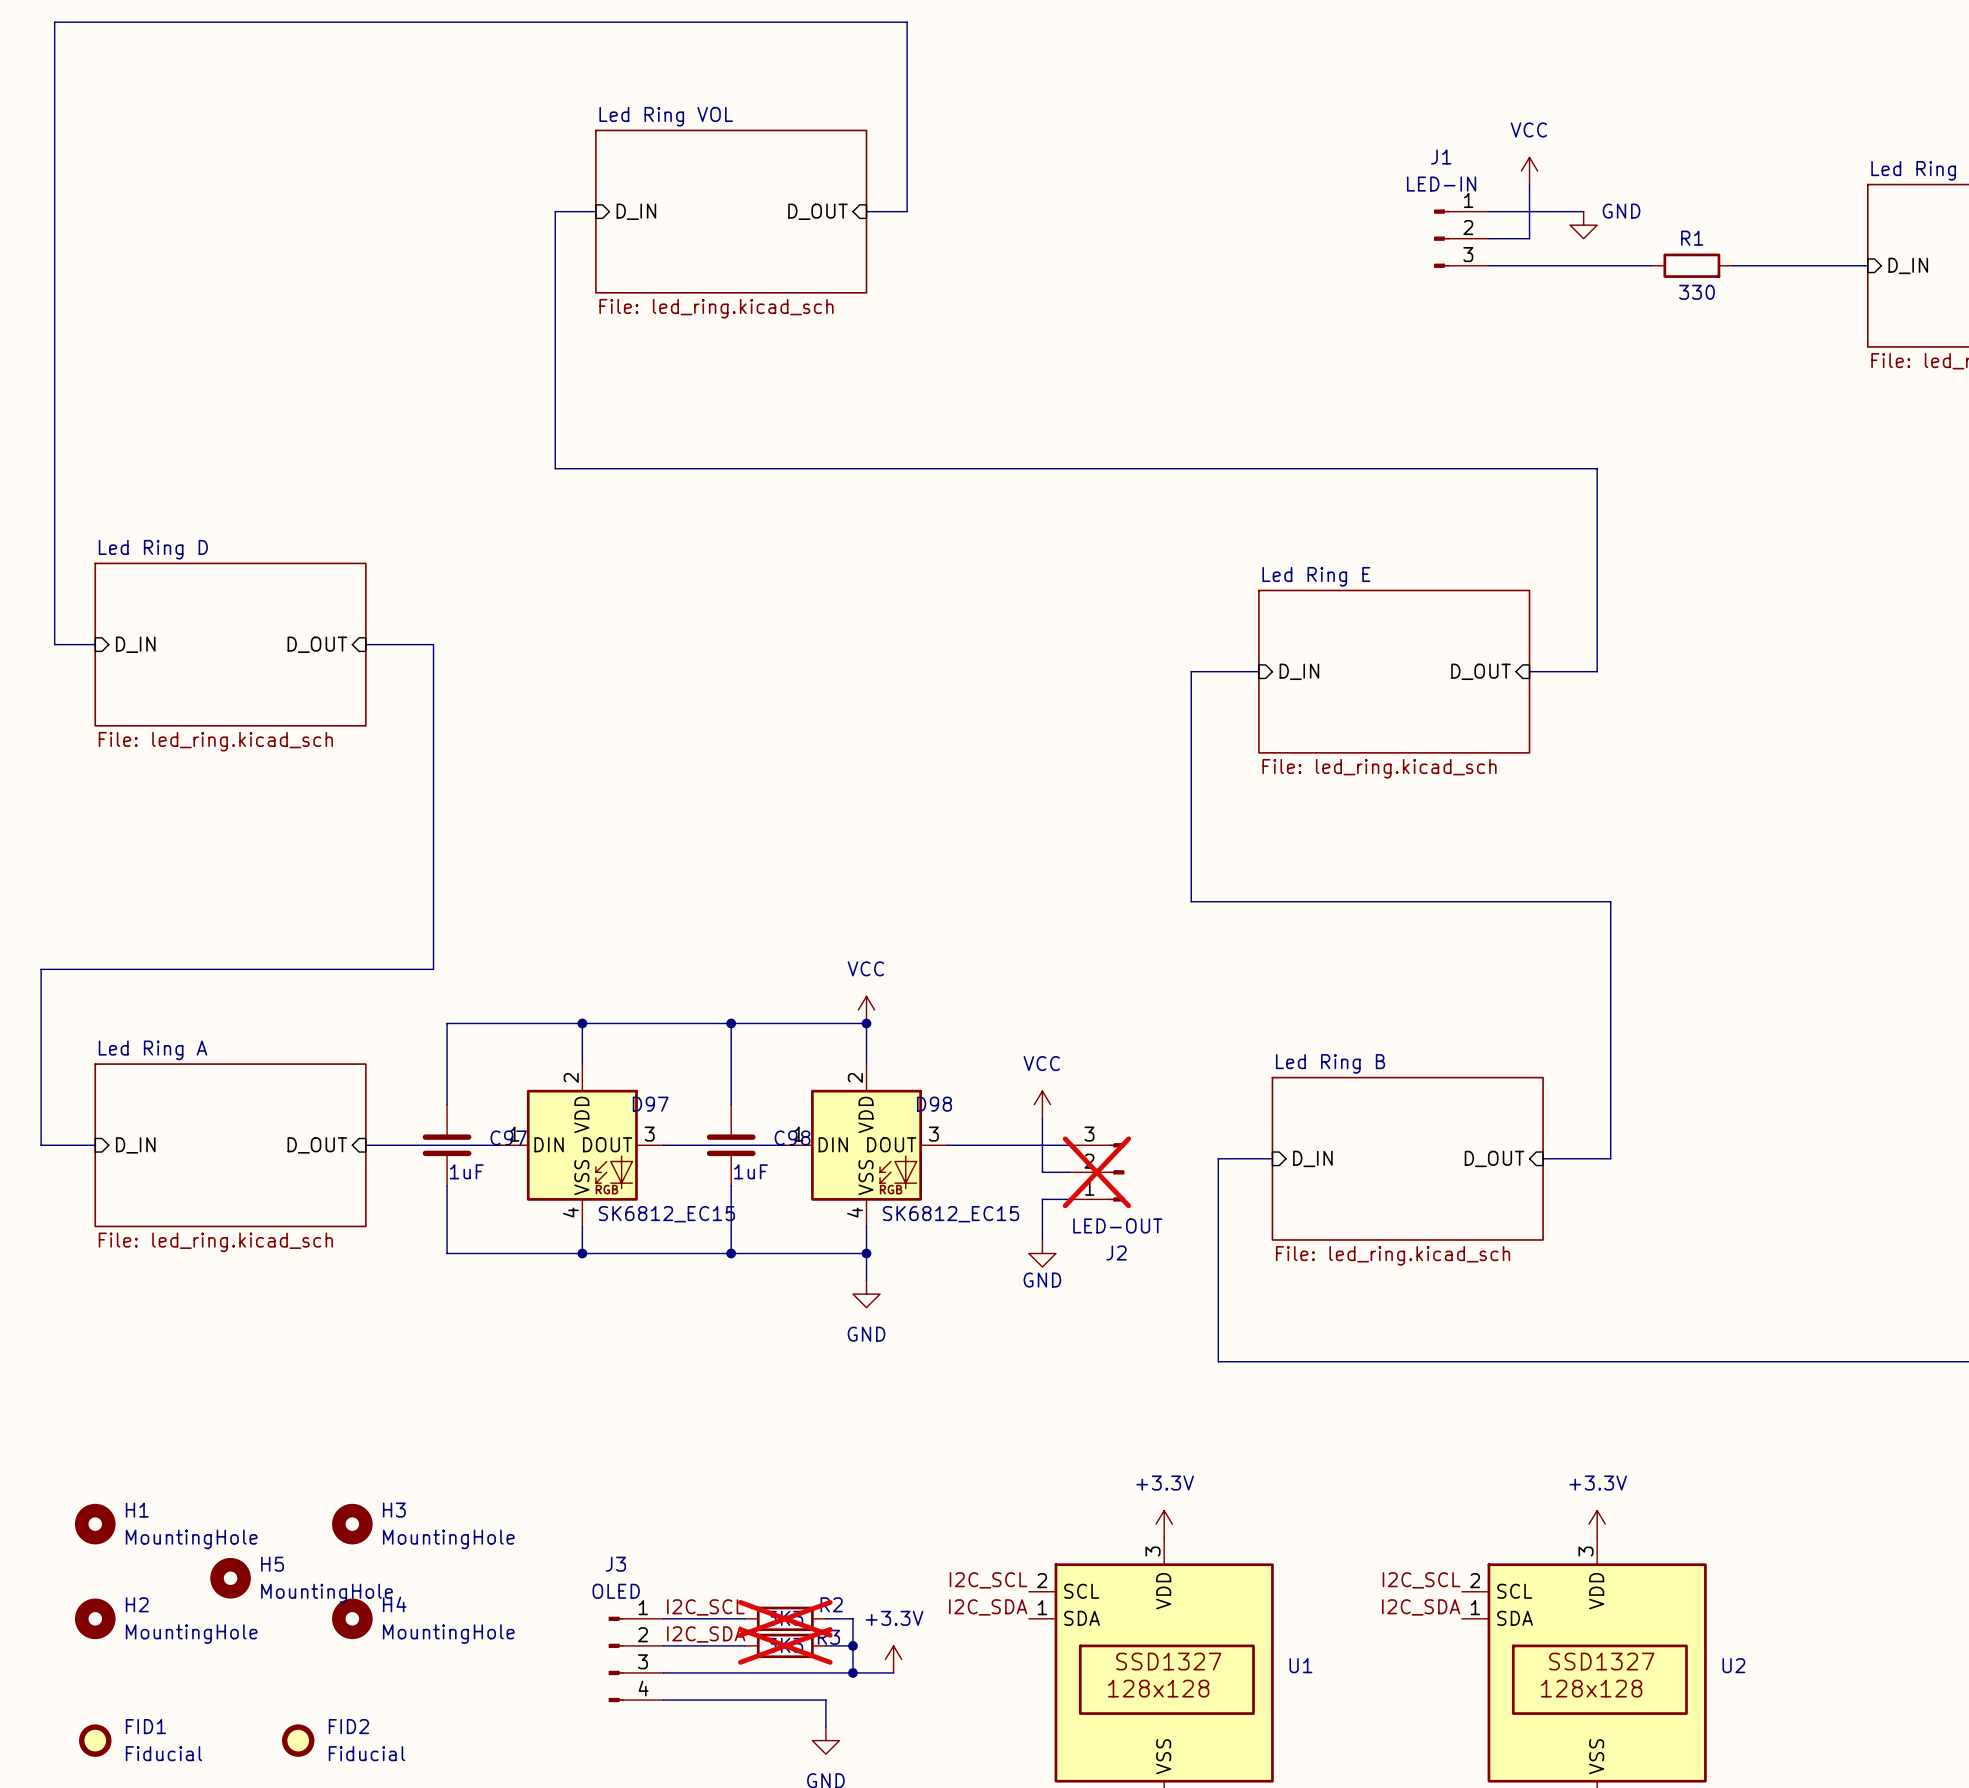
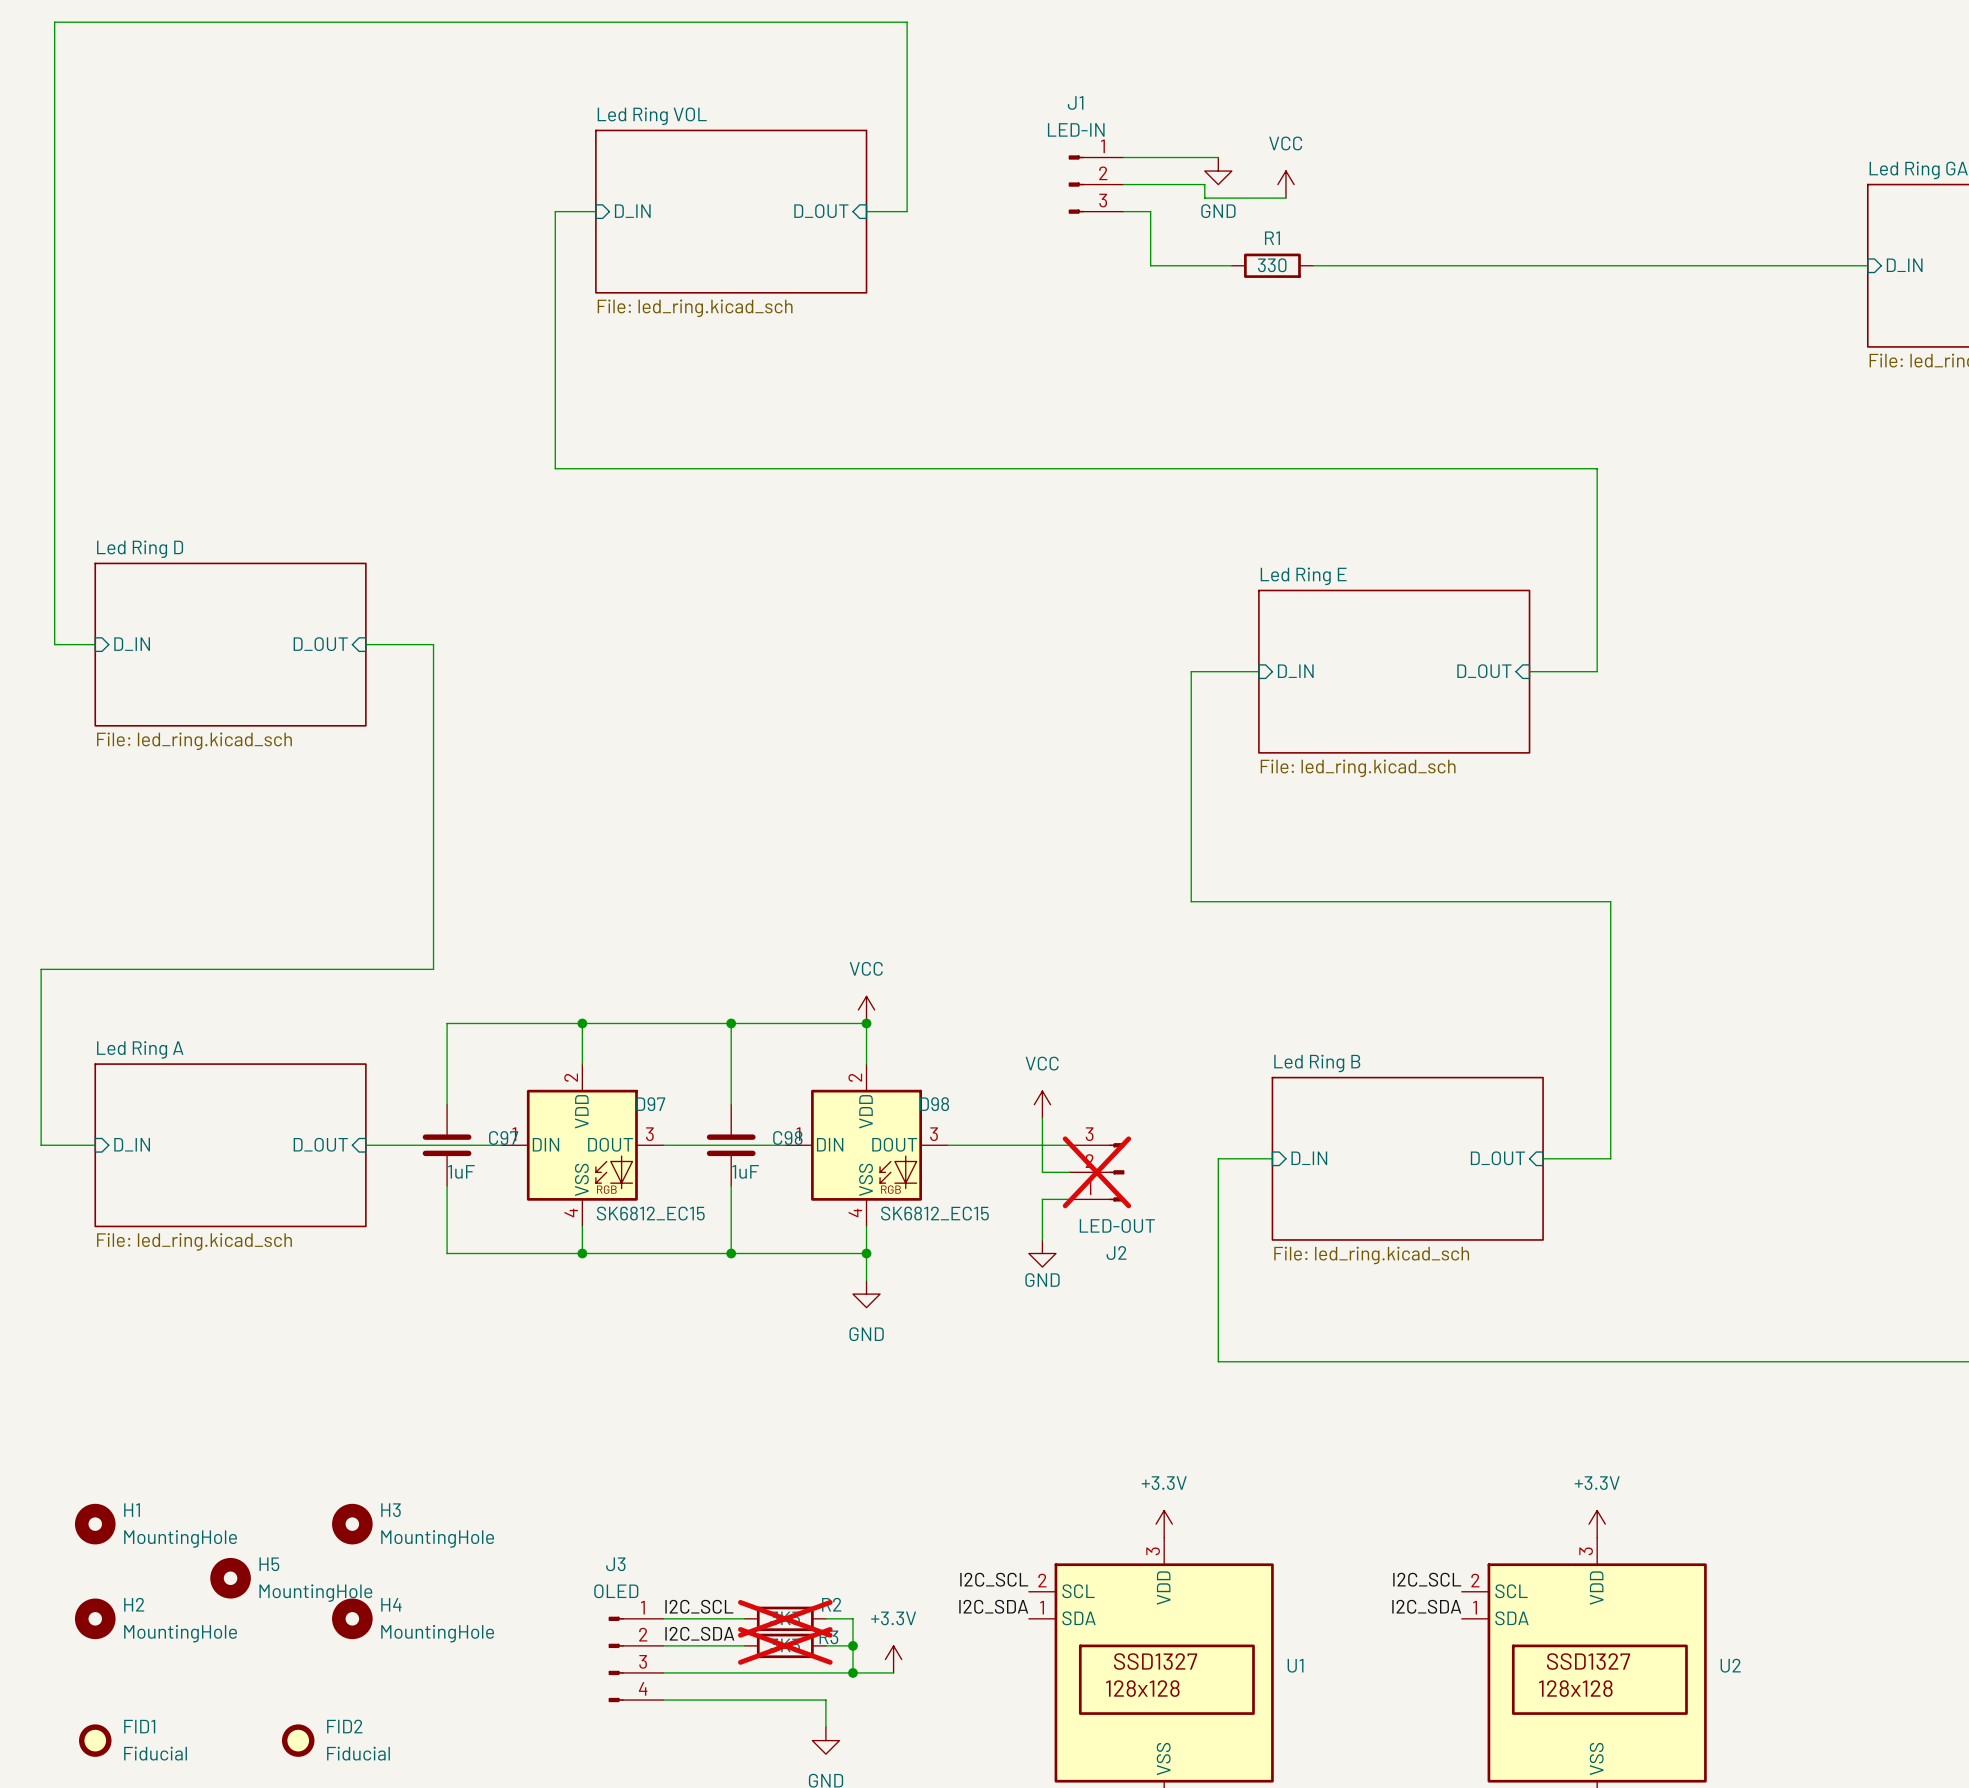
wire: none -> (1123, 157) (1218, 157)
power symbol: none -> GND (1218, 171)
power symbol position: VCC (1529, 171) -> VCC (1285, 184)
wire: none -> (1123, 184) (1204, 184) (1204, 198) (1285, 198)
wire: (1529, 184) (1529, 238) (1488, 238) -> none
wire: none -> (1123, 211) (1150, 211) (1150, 265) (1231, 265)
wire: (1488, 211) (1583, 211) -> none
power symbol: GND (1583, 225) -> none
J1 position: (1461, 238) -> (1096, 184)
wire: none -> (1313, 265) (1488, 265)
wire: none -> (1651, 265) (1732, 265)
R1 position: (1691, 265) -> (1272, 265)
R1 value position: 330 (1696, 292) -> 330 (1272, 265)

